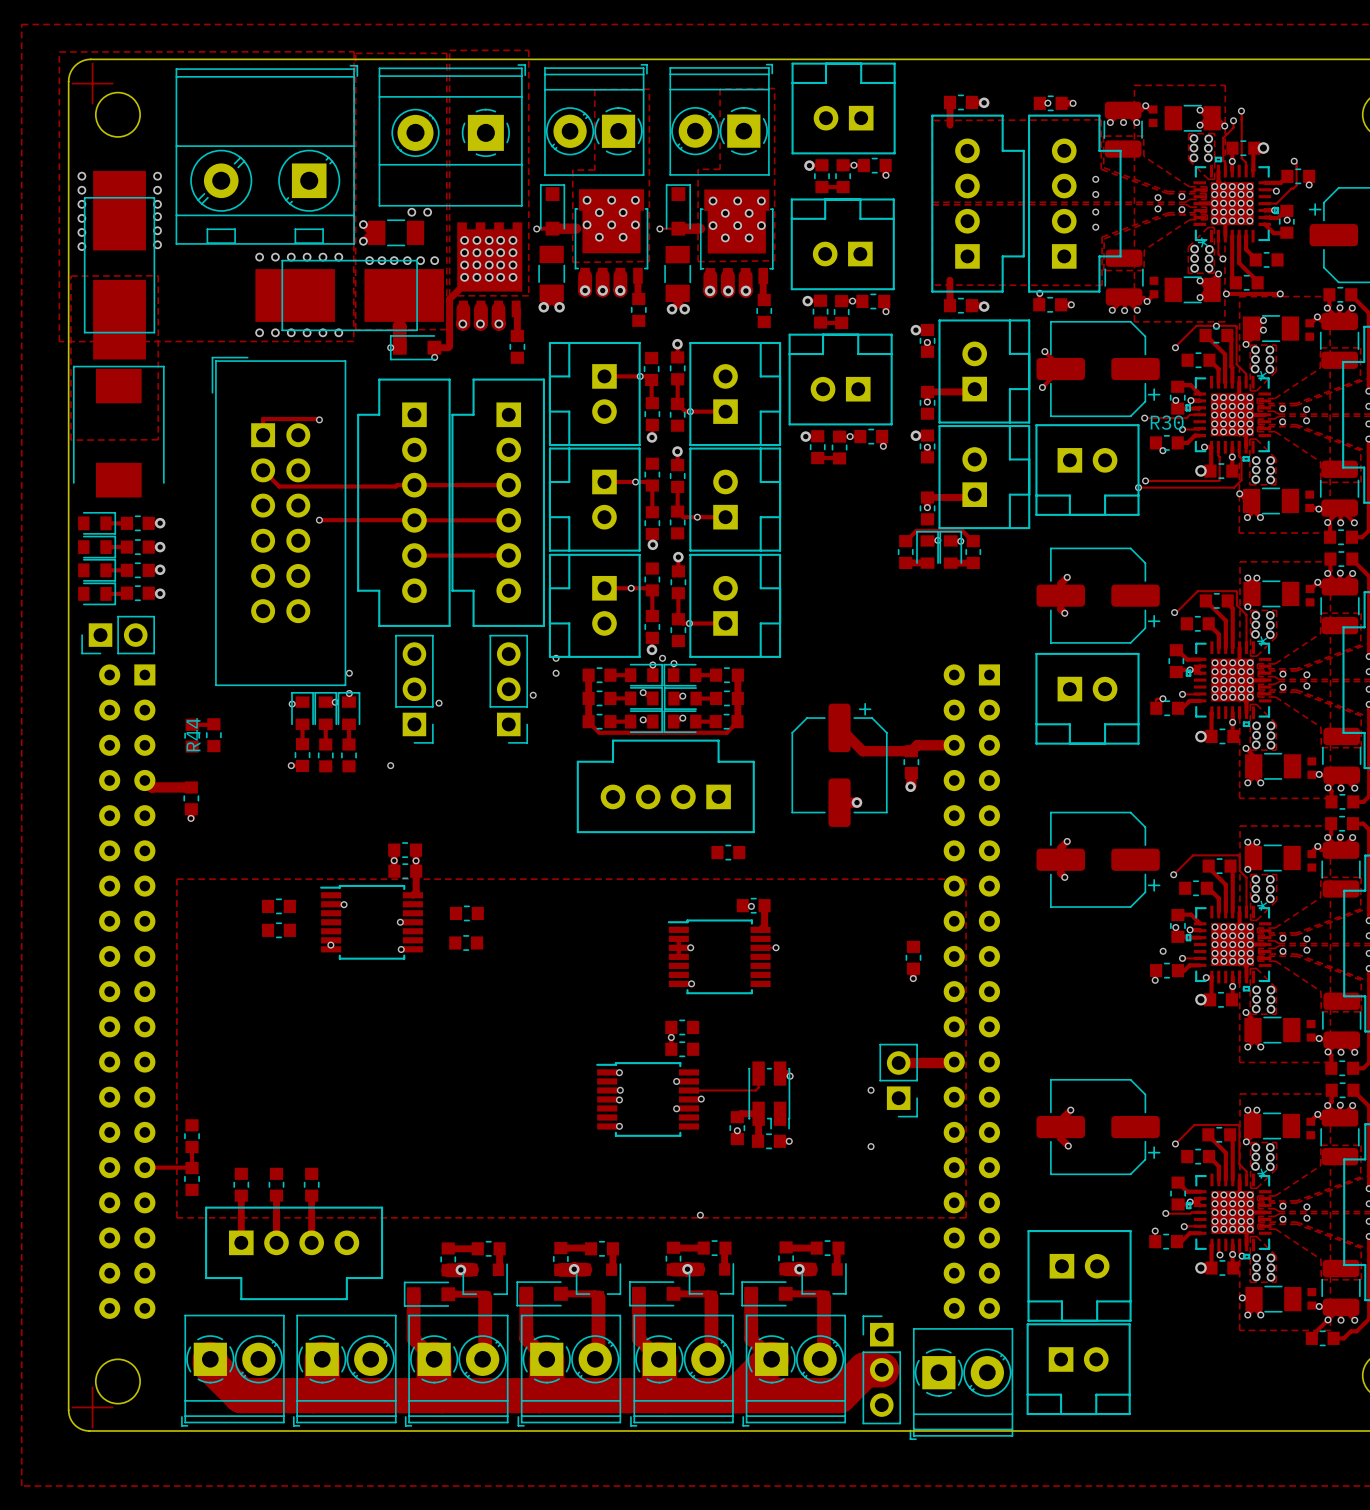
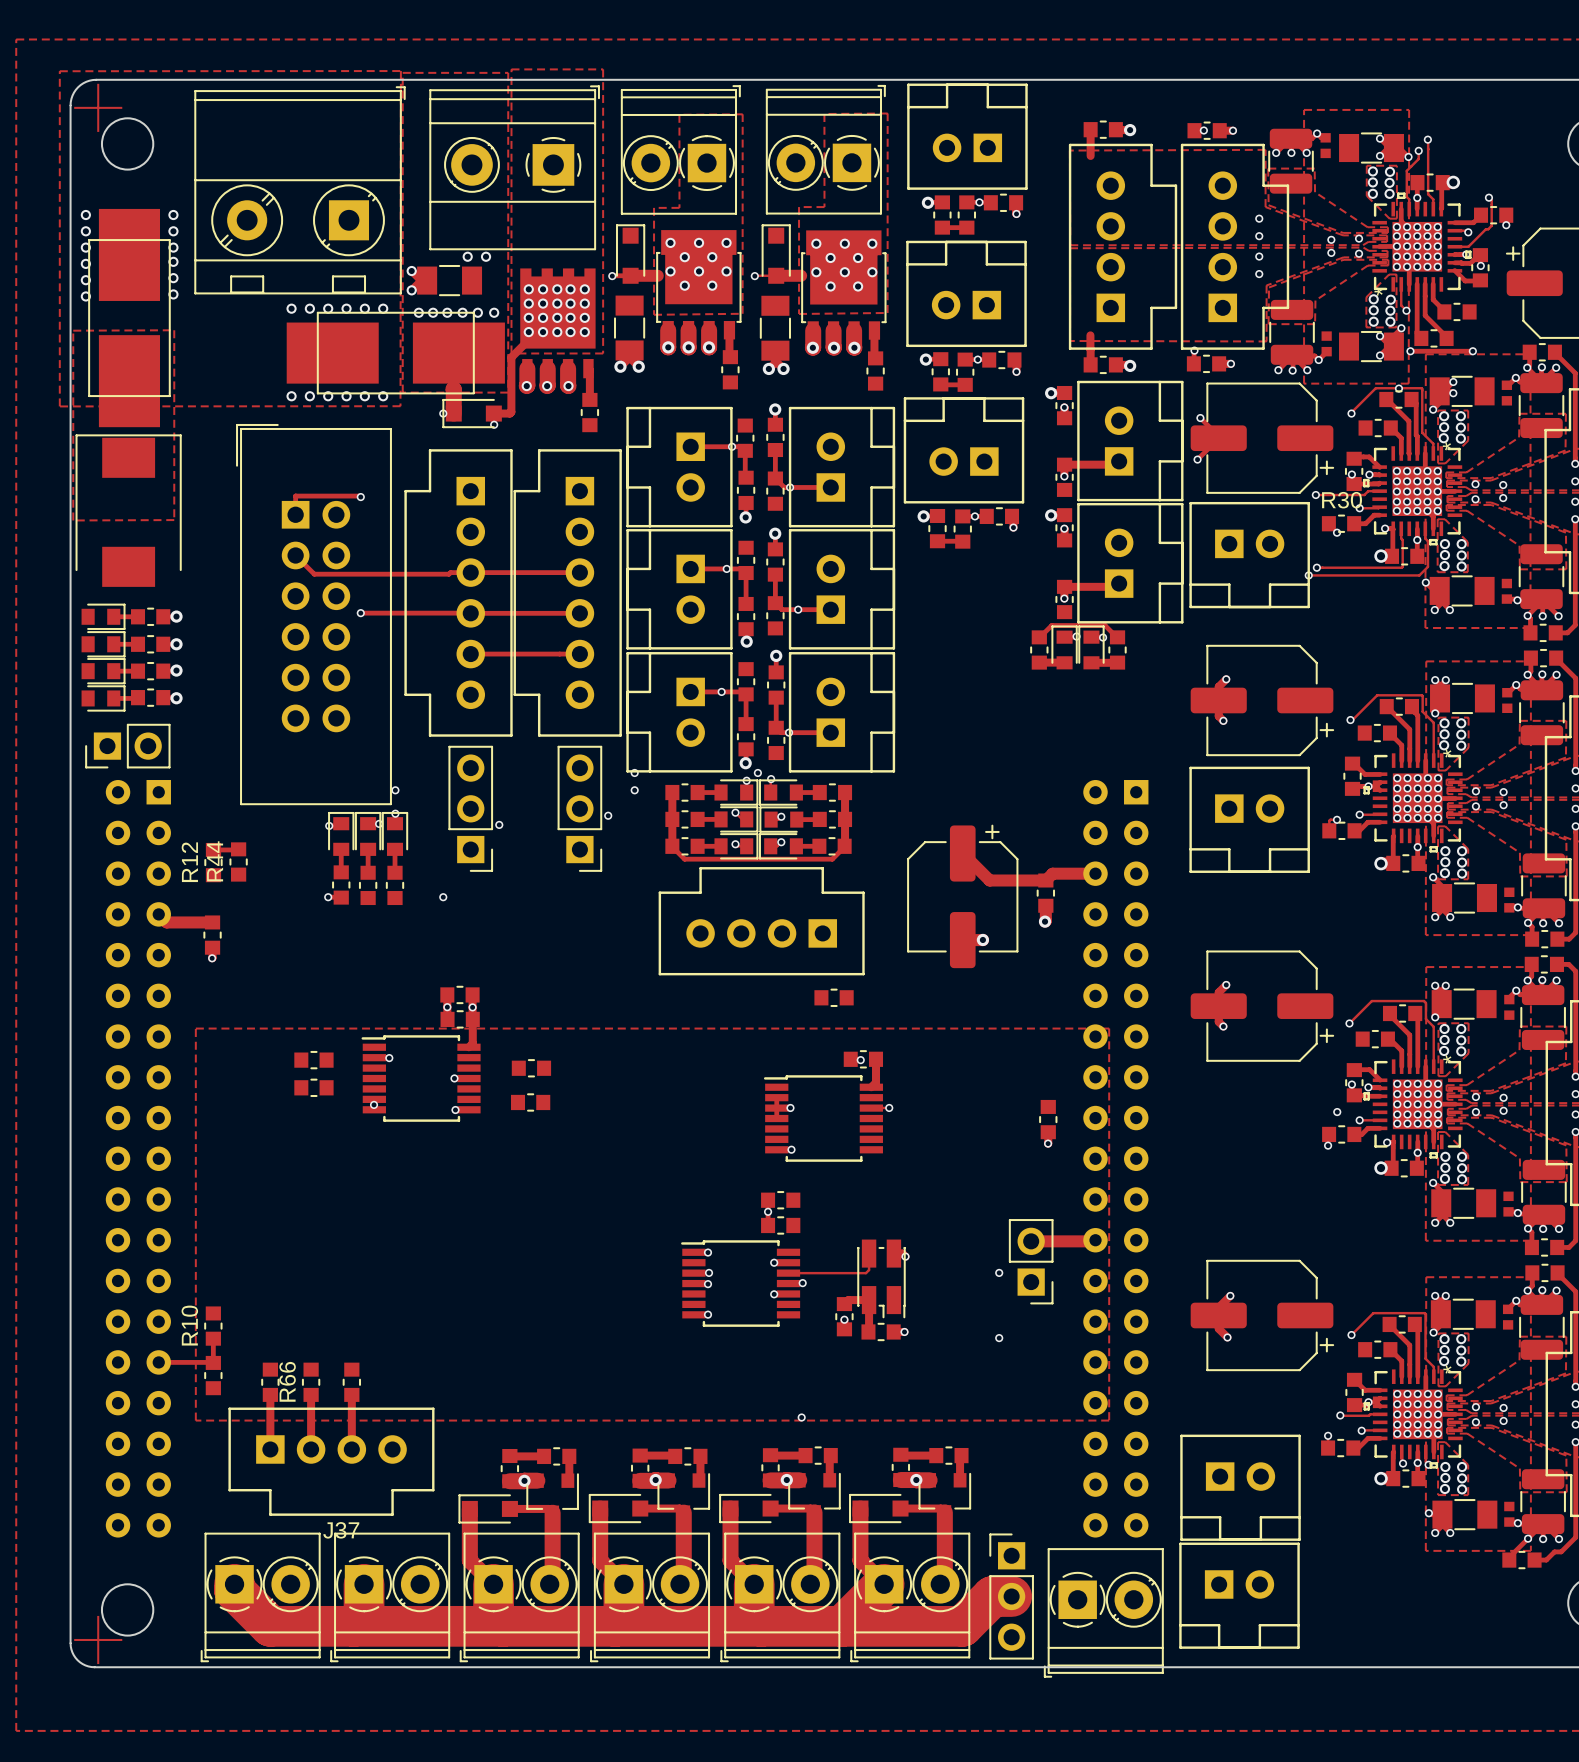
R12 name: none -> R12 (189, 862)
R10 name: none -> R10 (189, 1325)
R66 name: none -> R66 (287, 1381)
J37 name: none -> J37 (341, 1530)

